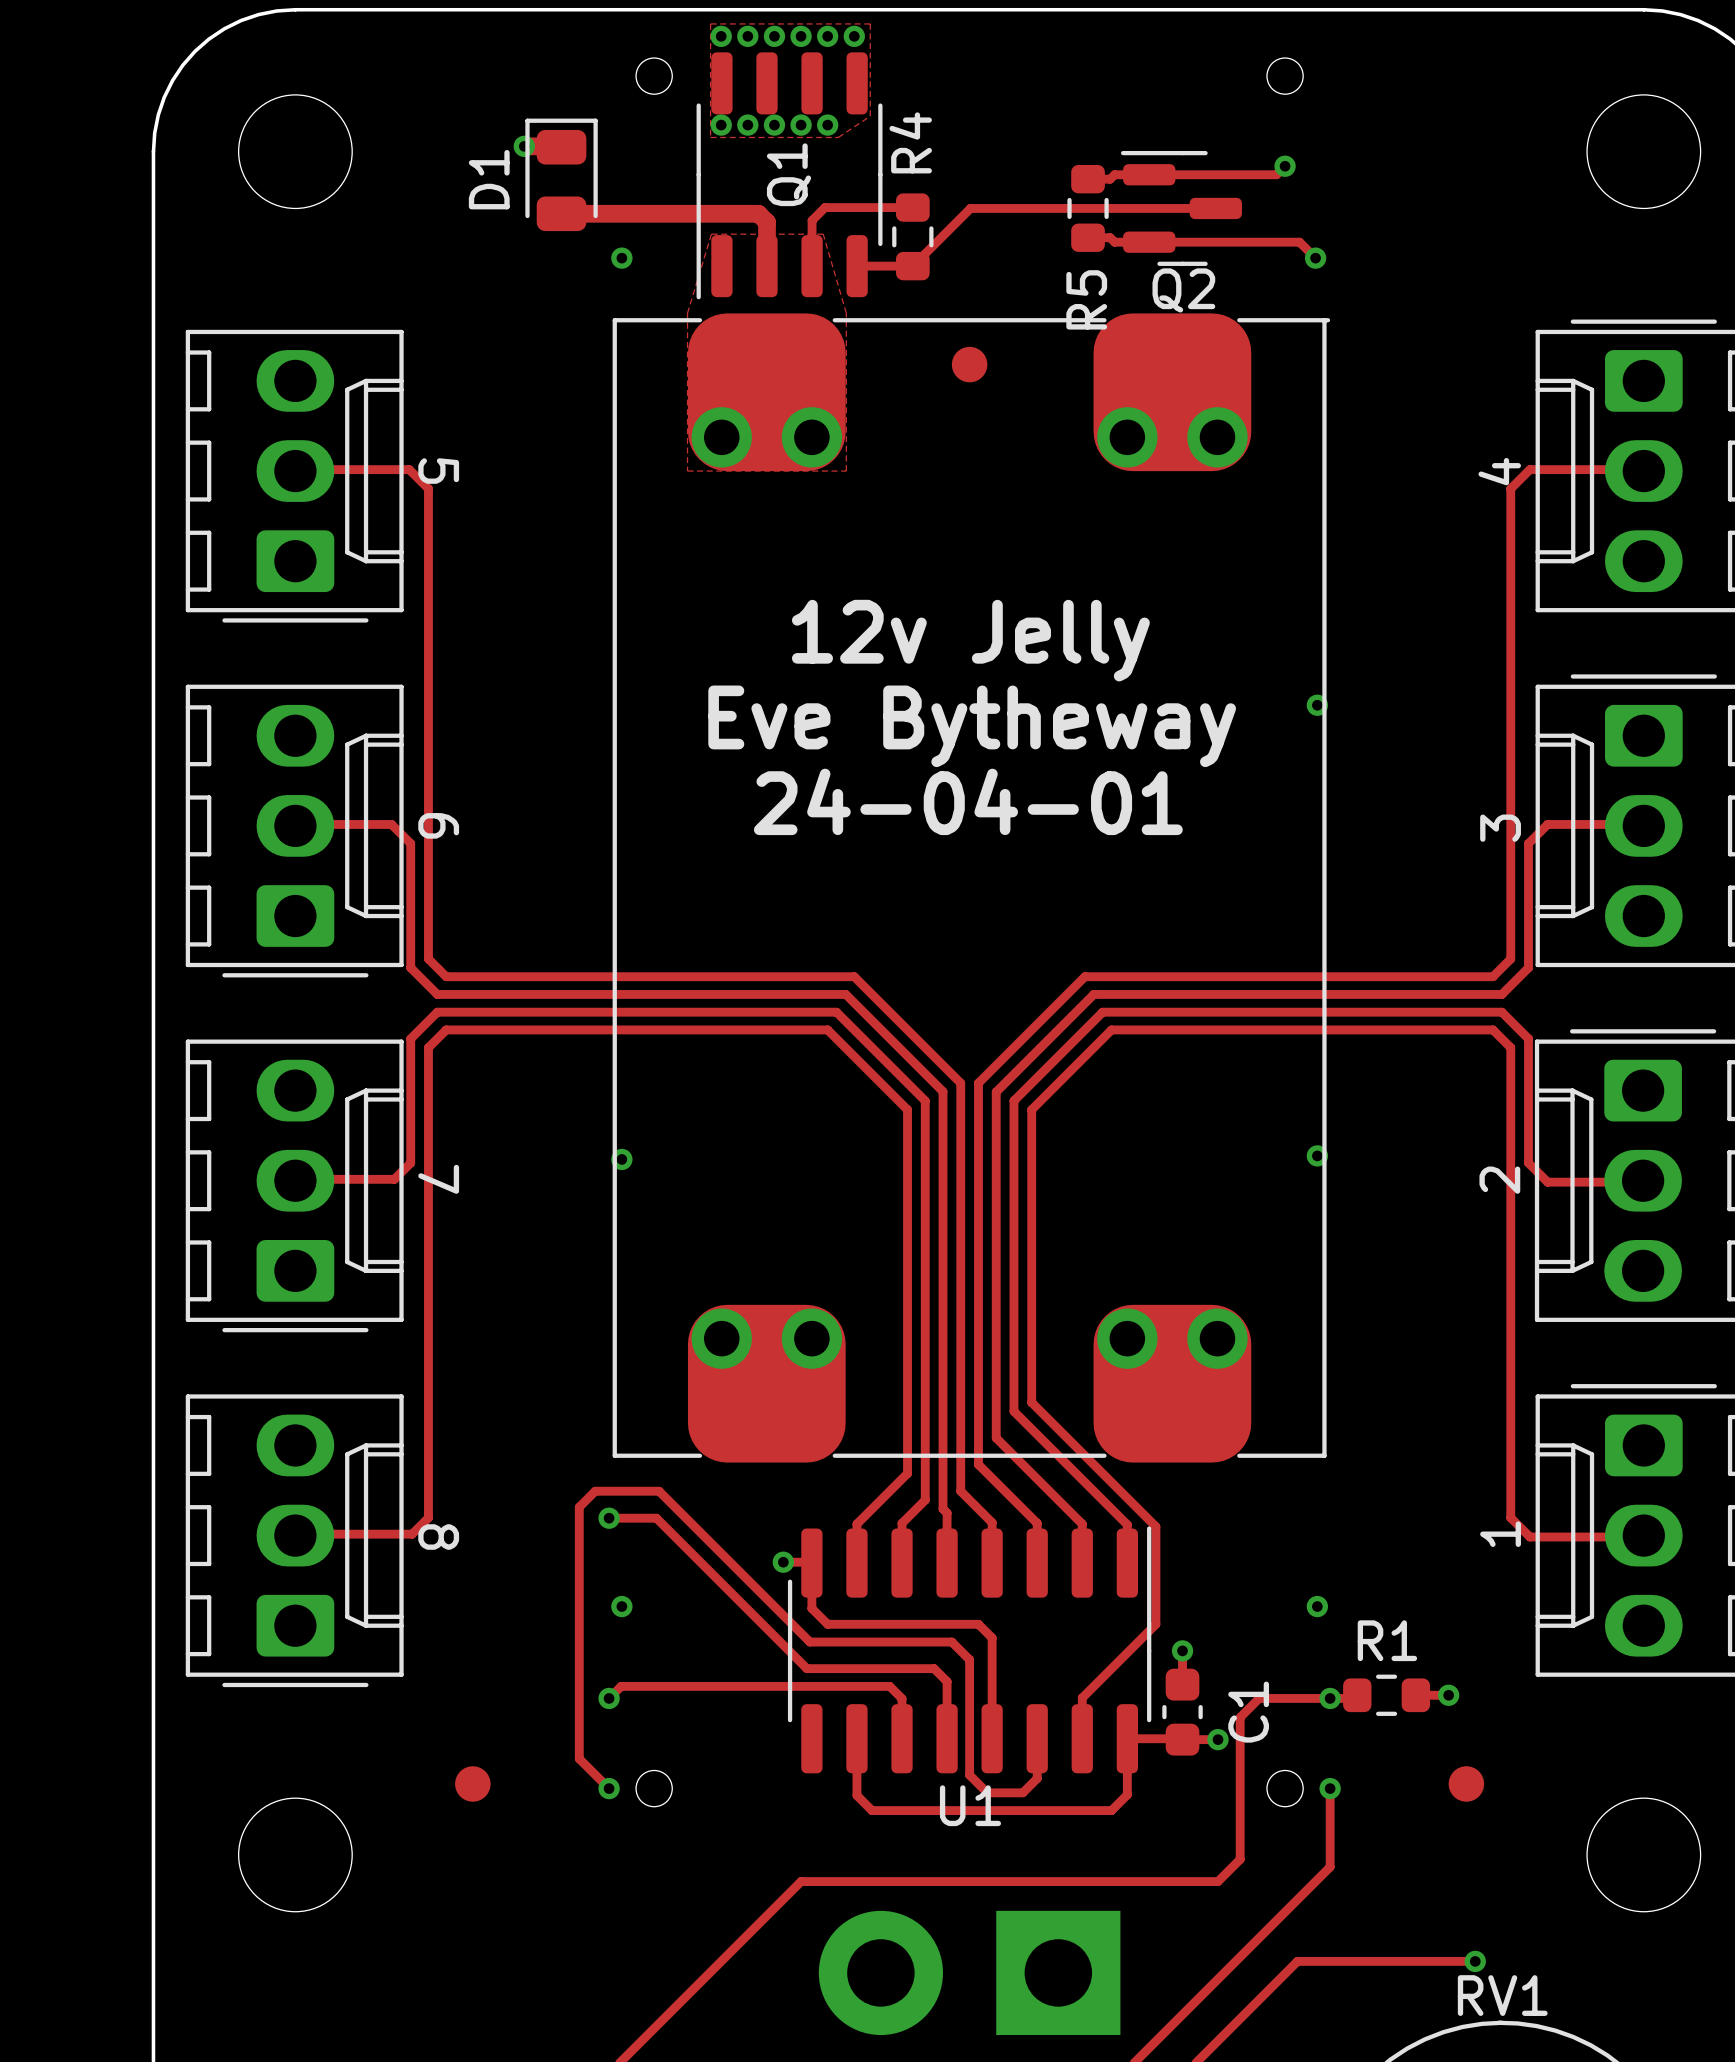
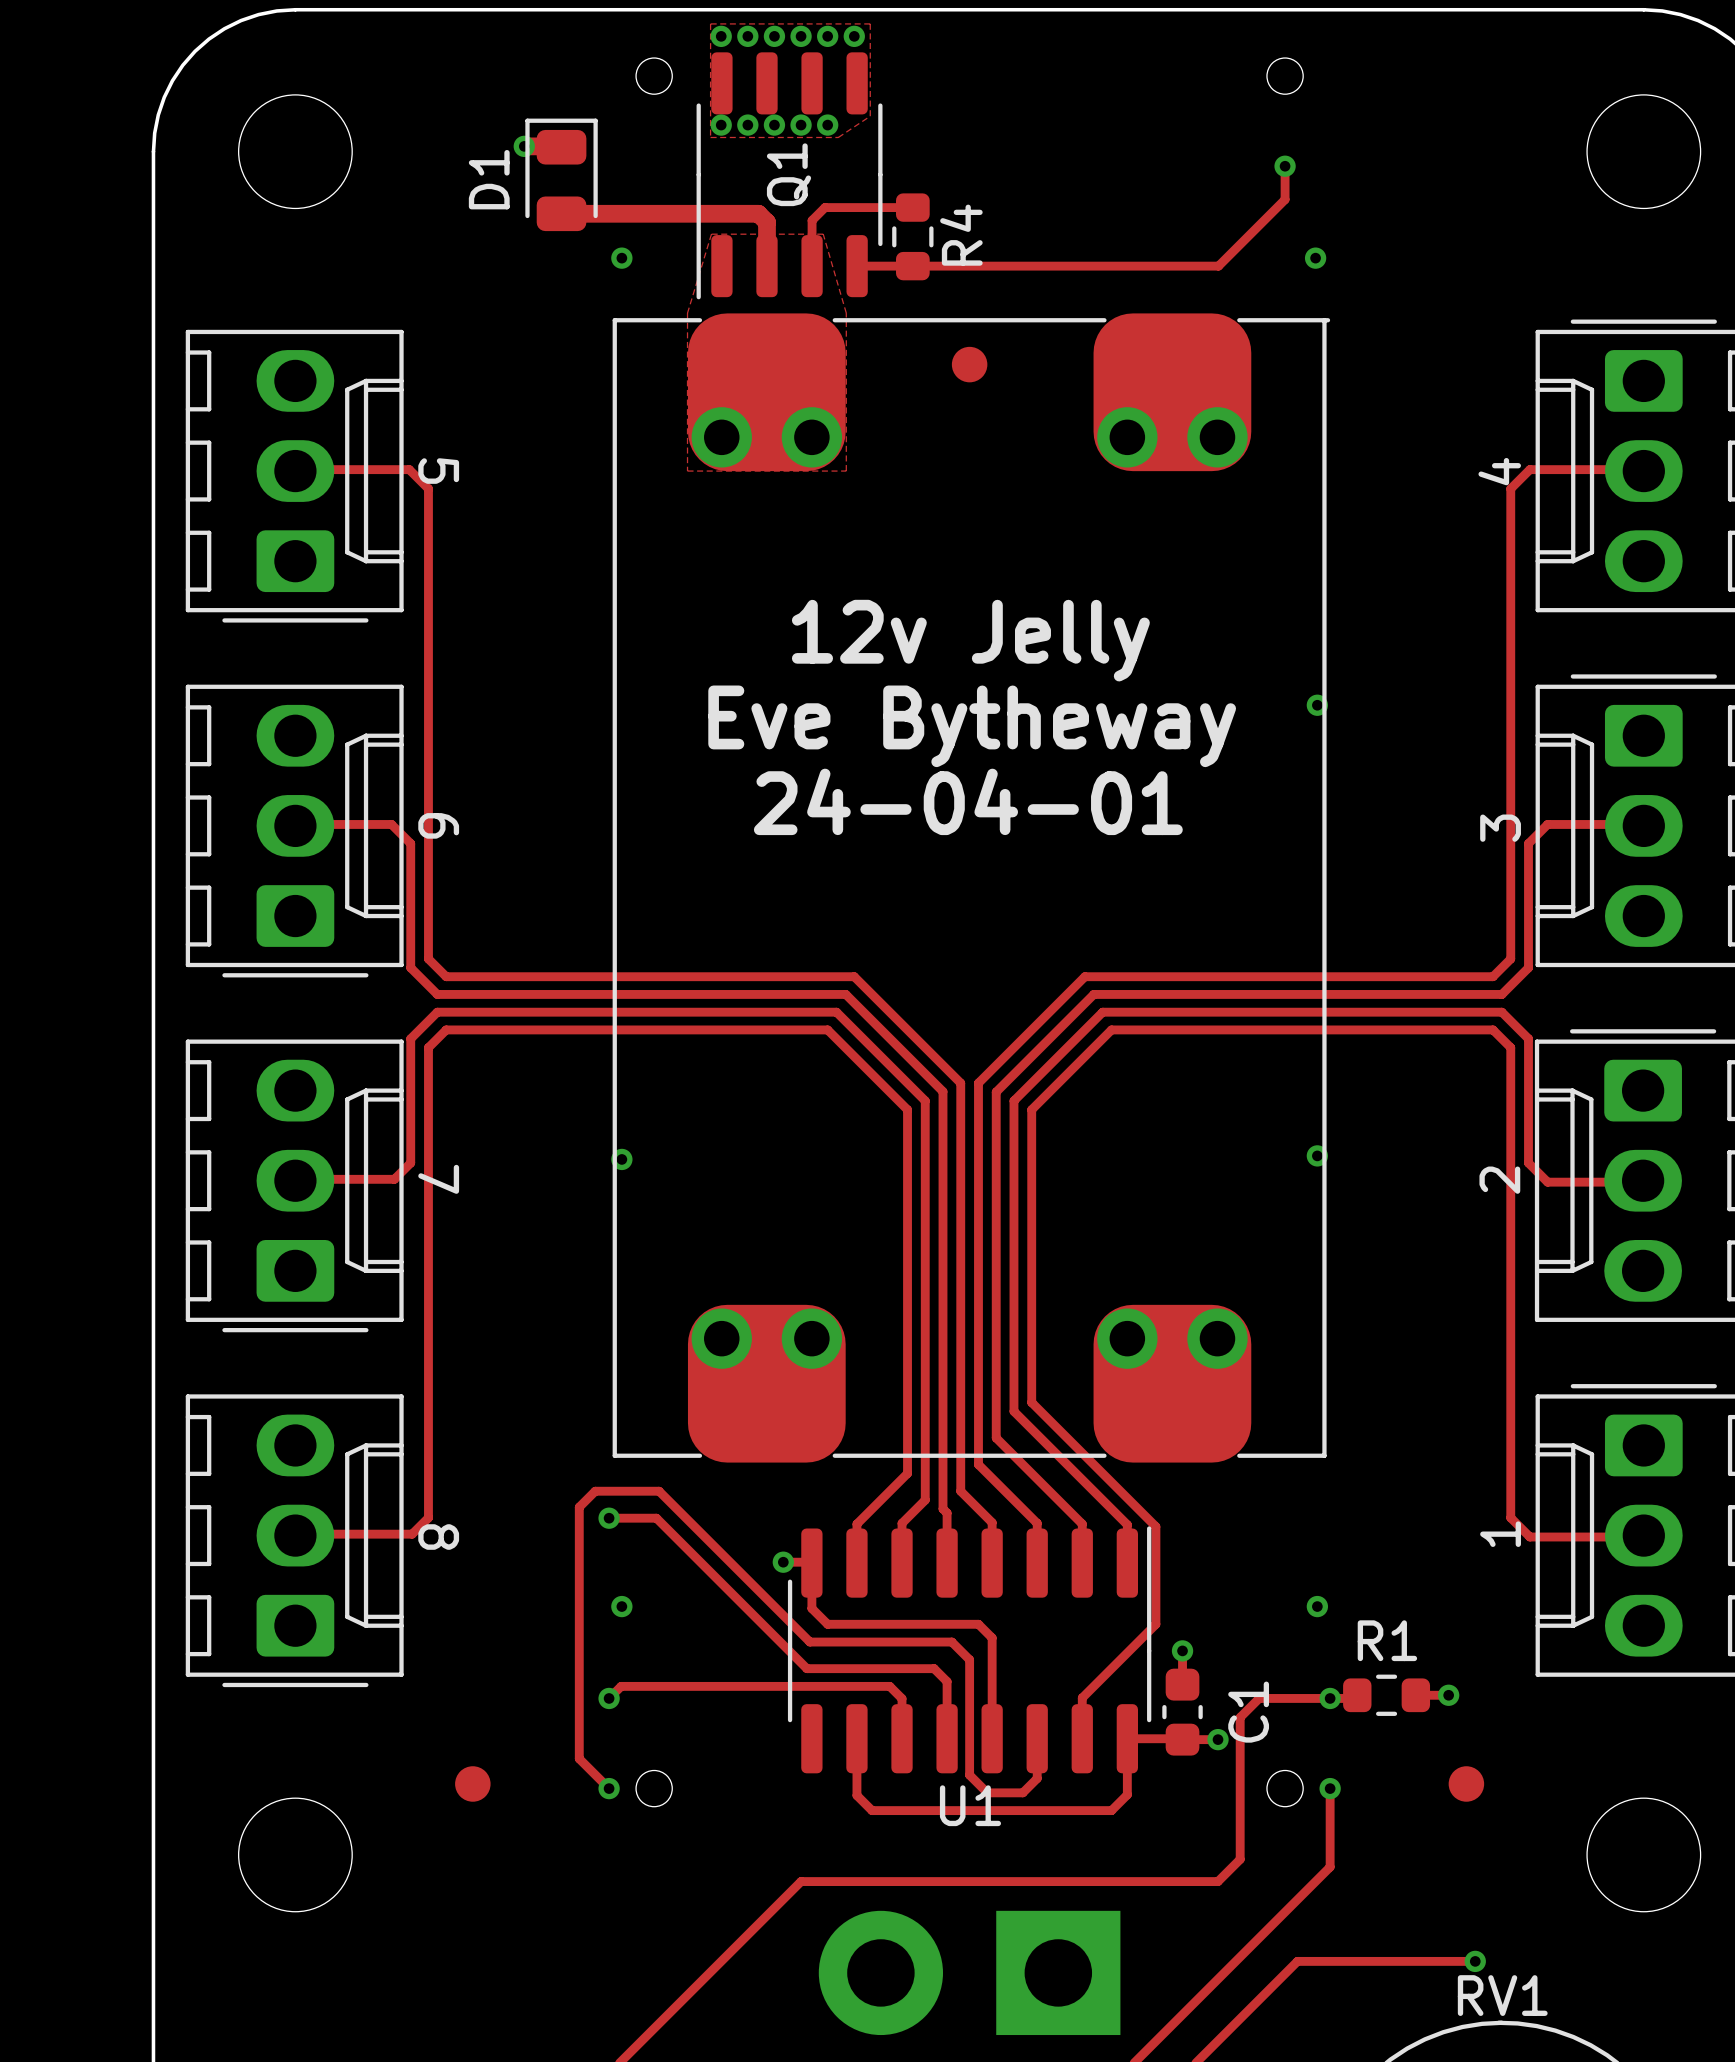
R4 name position: R4 (910, 142) -> R4 (961, 235)
track: (1285, 166) (1276, 174) (1114, 174) (1110, 179) (1088, 179) -> none
R5: (1088, 208) -> none
Q2: (1181, 208) -> none
track: (1215, 208) (970, 208) (912, 266) -> (1285, 166) (1285, 199) (1218, 266) (912, 266)
track: (1088, 237) (1110, 237) (1114, 242) (1299, 242) (1315, 258) -> none

